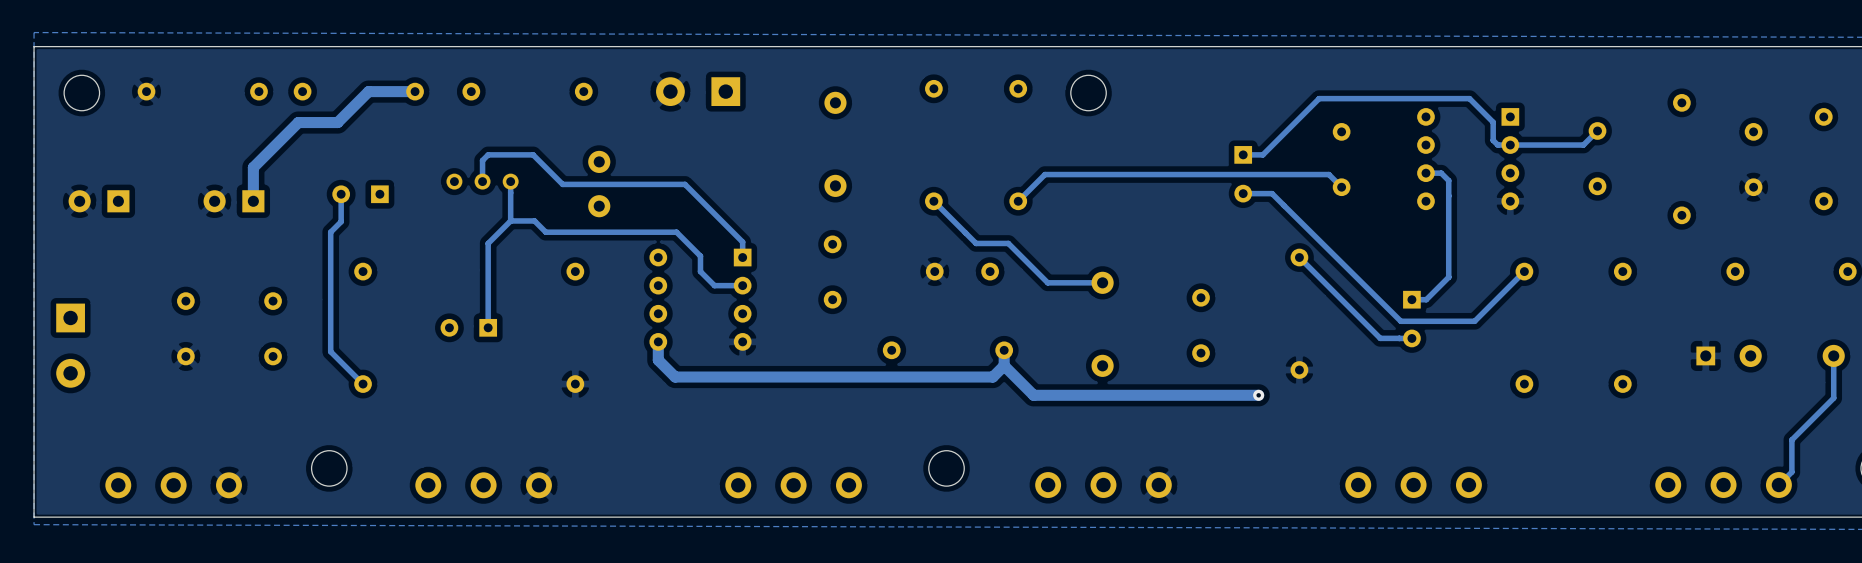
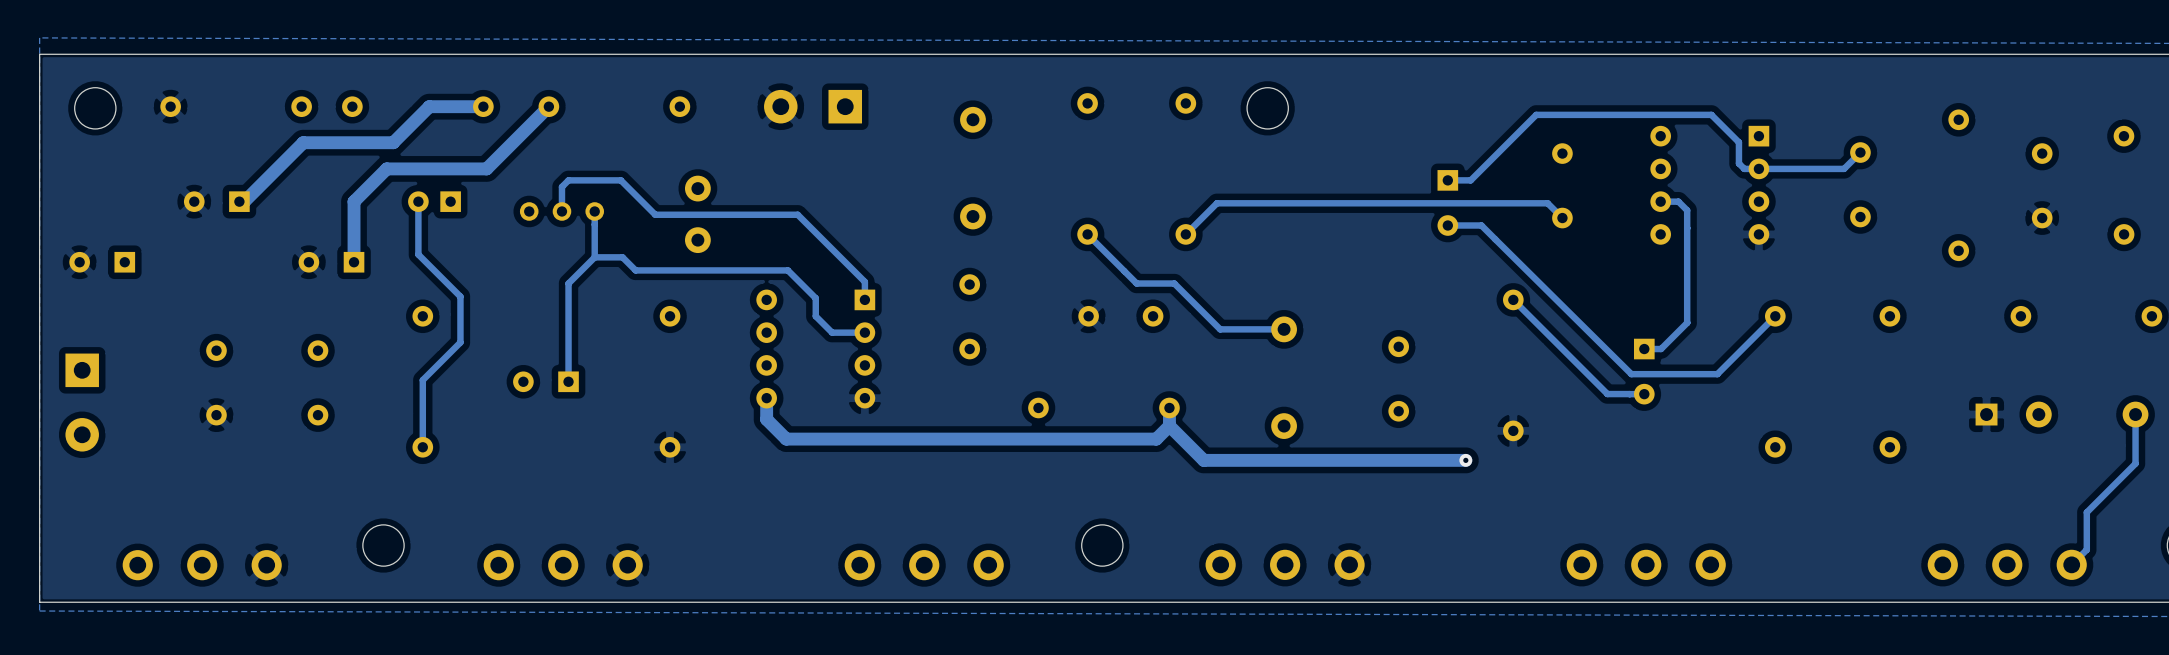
track: none -> (548, 106) (486, 168) (386, 168) (354, 201) (354, 262)
track: (298, 122) (253, 167) (253, 201) -> (347, 142) (303, 142) (244, 201) (239, 201)
part: none -> (216, 201)
part: none -> (434, 201)
track: (341, 194) (341, 221) (330, 232) (330, 351) (363, 384) -> (418, 201) (418, 254) (460, 296) (460, 342) (422, 380) (422, 447)
part position: (360, 194) -> (331, 262)
part: (99, 201) -> none
part: (234, 201) -> none
part: none -> (102, 262)

